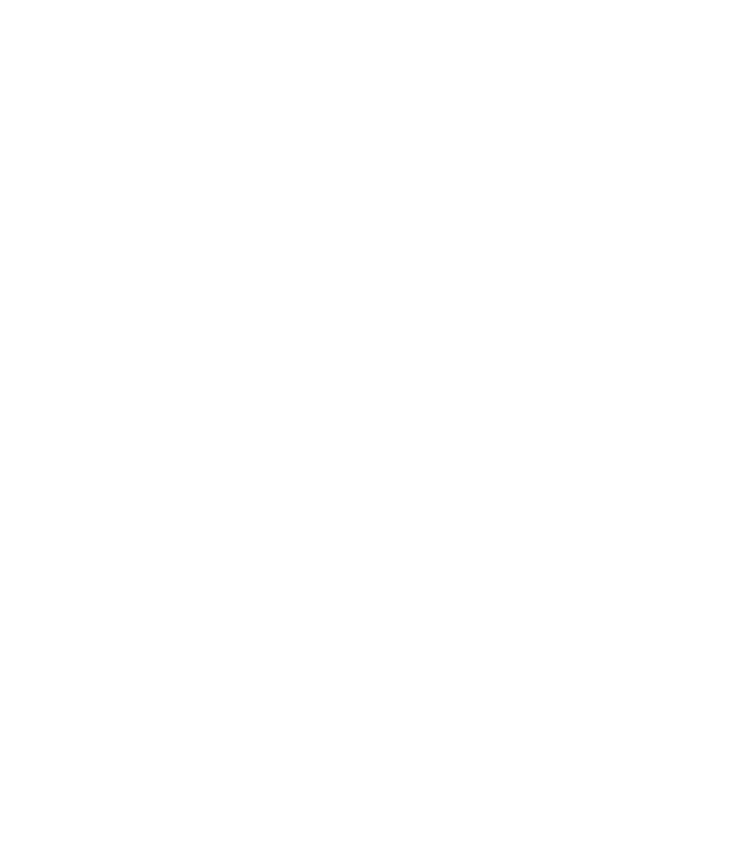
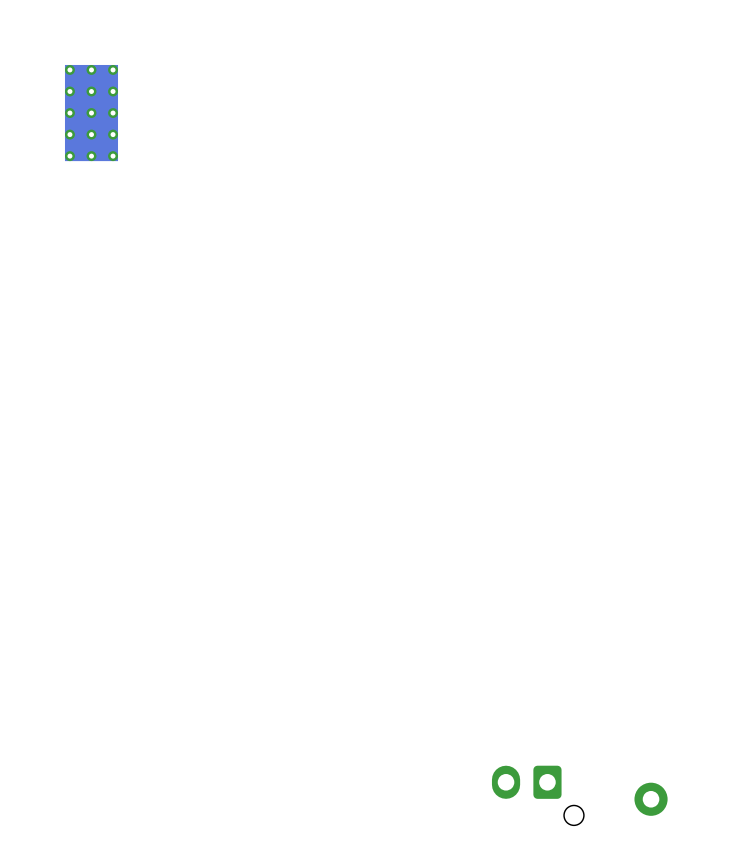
part: none -> (91, 113)
part: none -> (537, 795)
part: none -> (651, 799)

